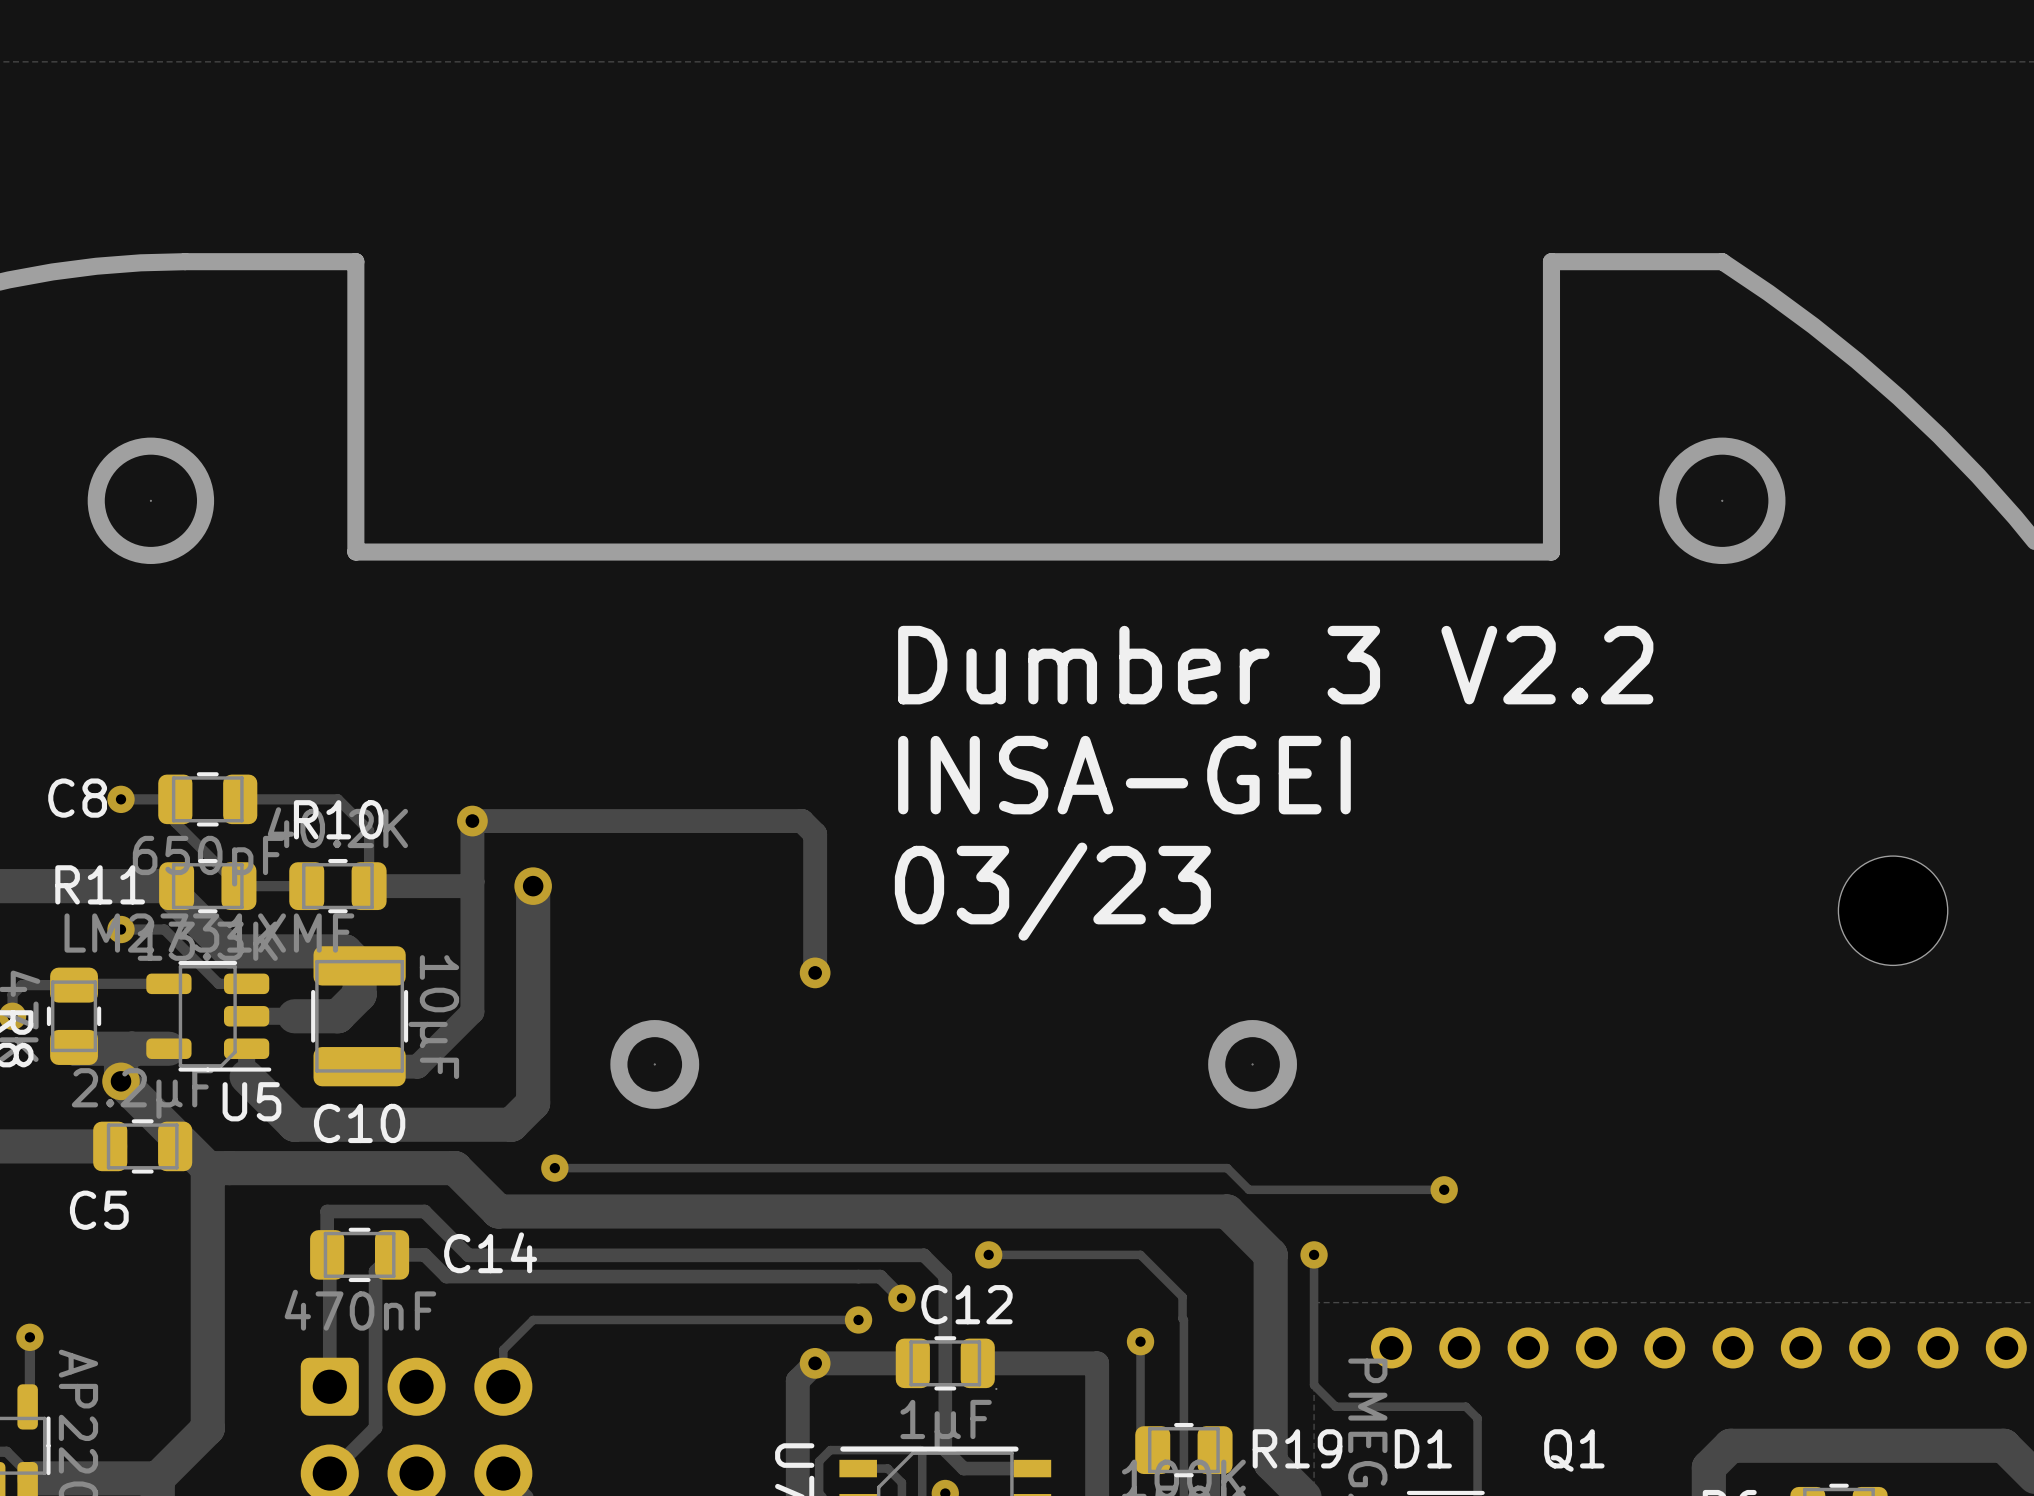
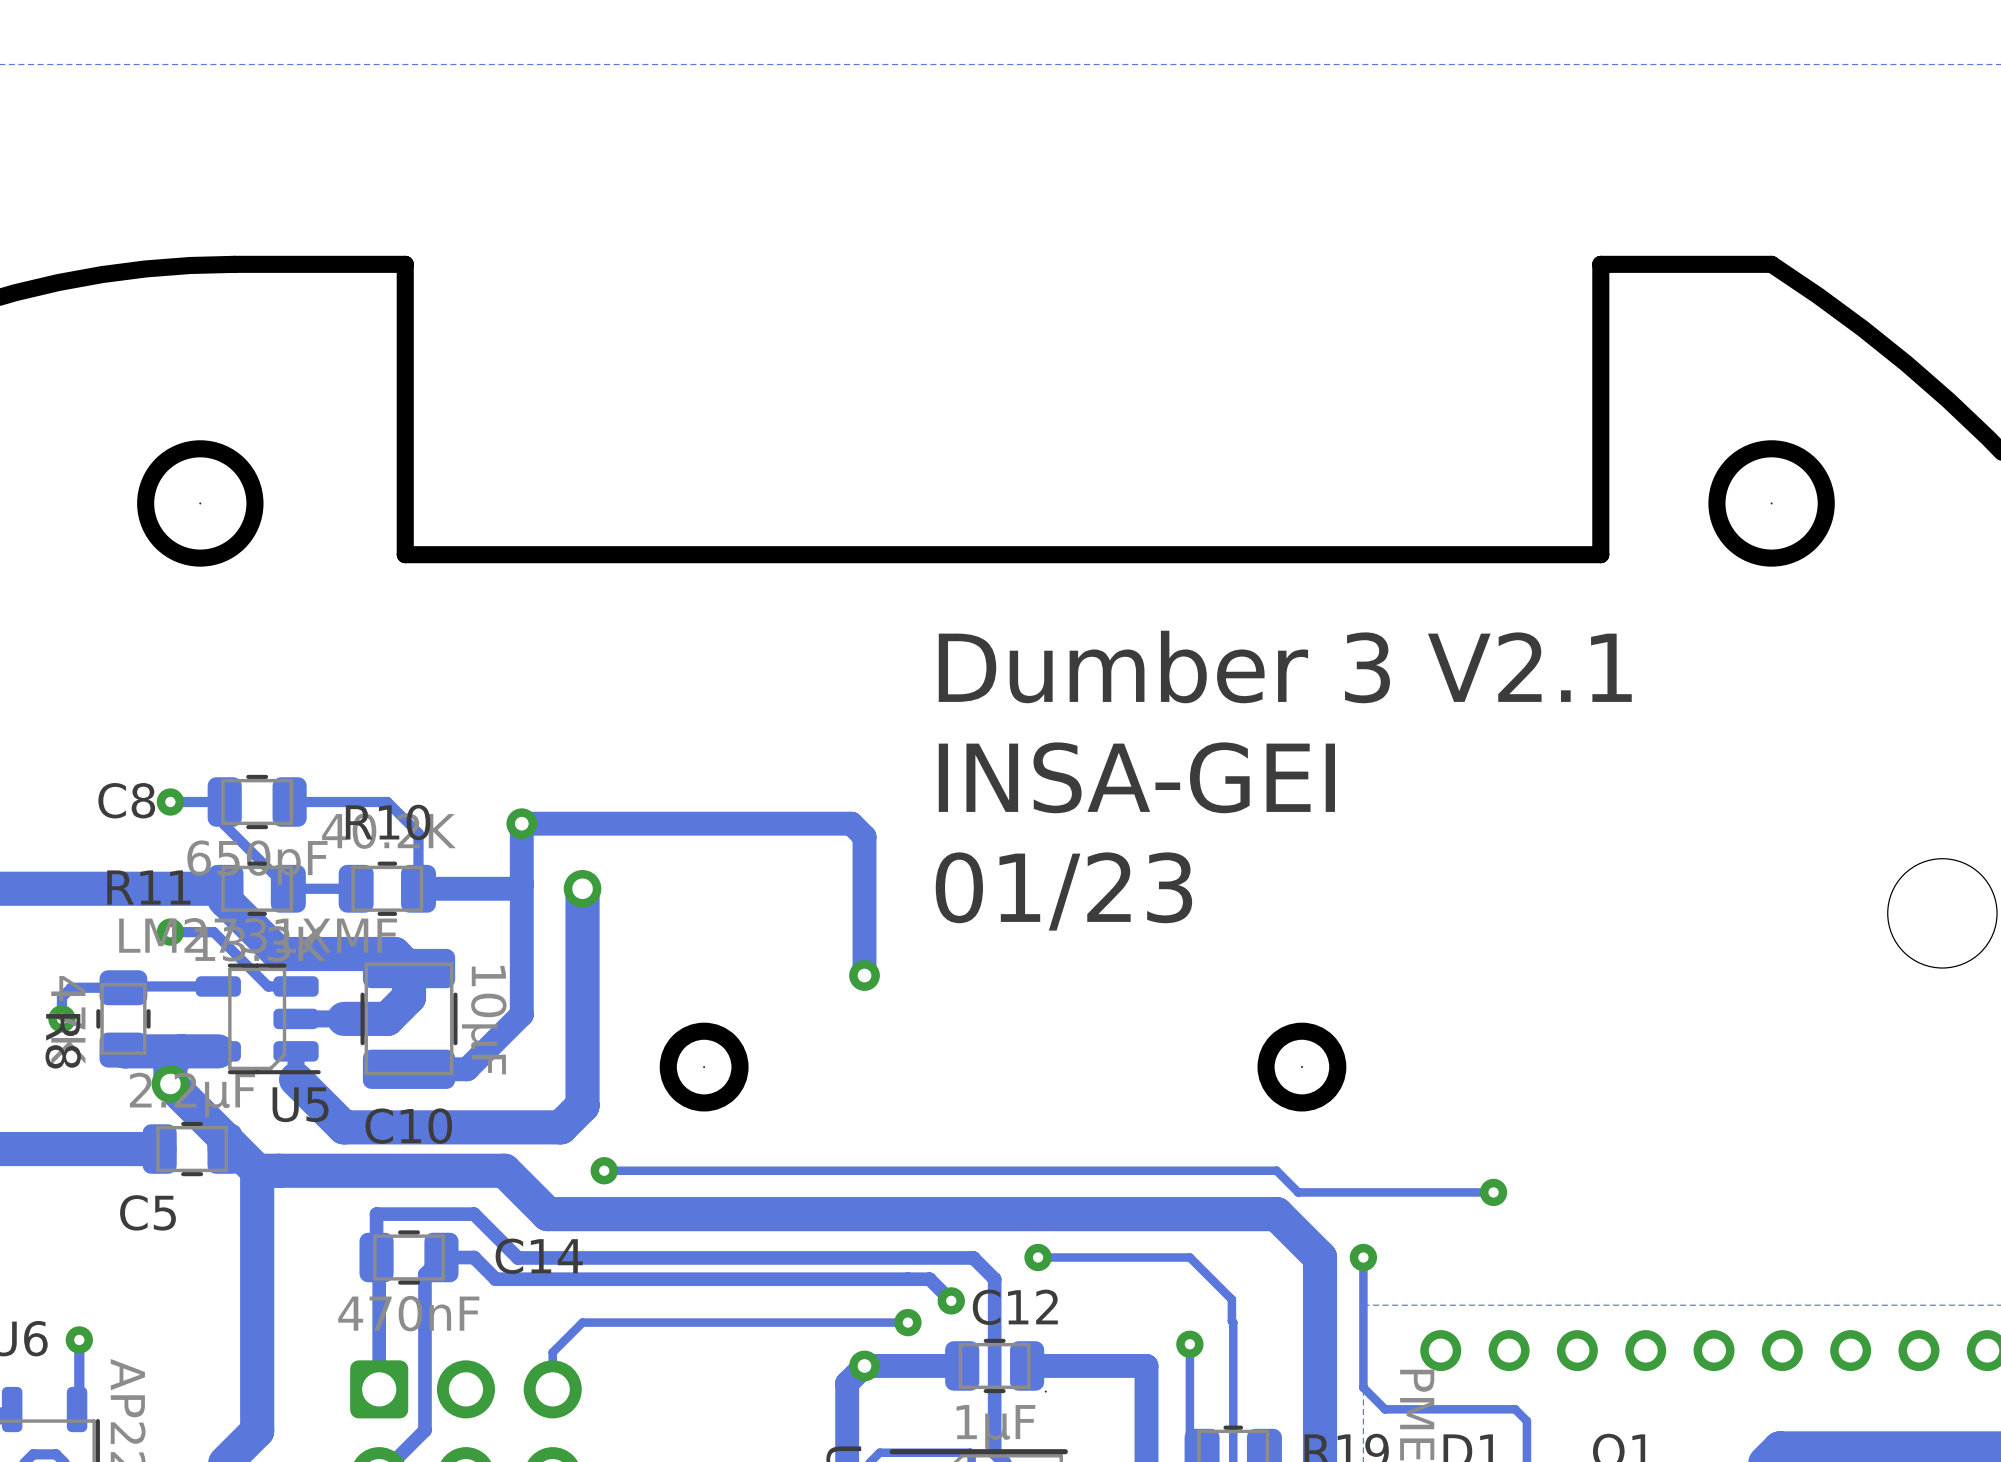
text: Dumber 3 V2.2 (1275, 665) -> Dumber 3 V2.1 (1285, 666)
text: 03/23 (1052, 891) -> 01/23 (1063, 891)

